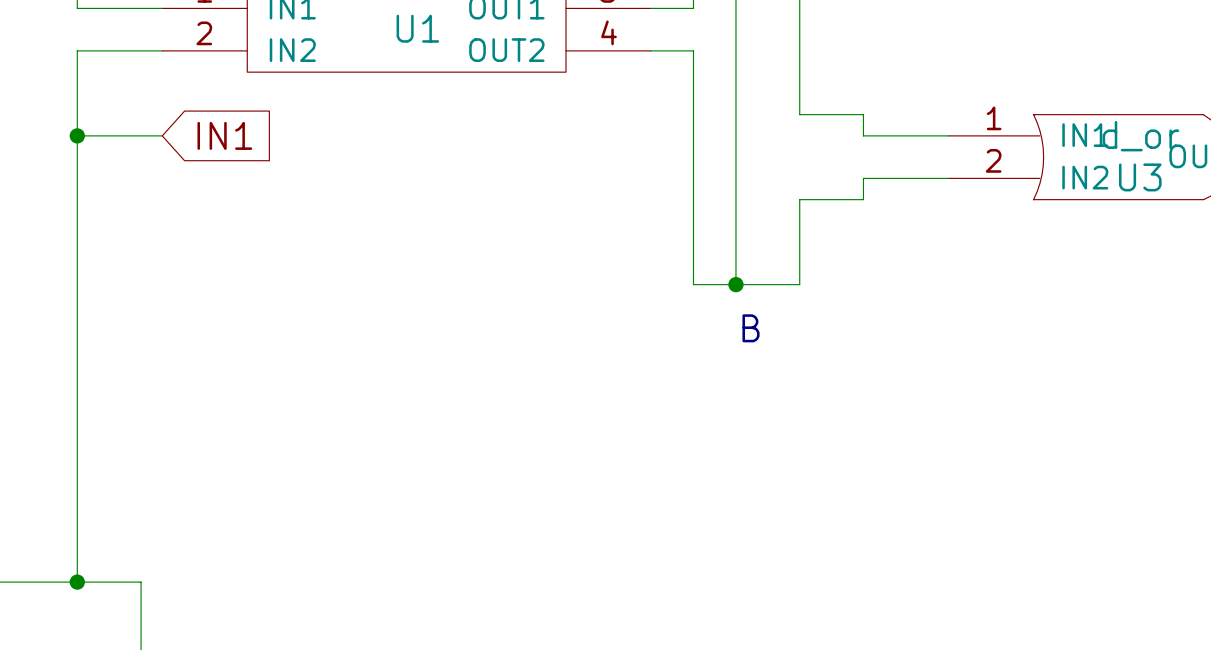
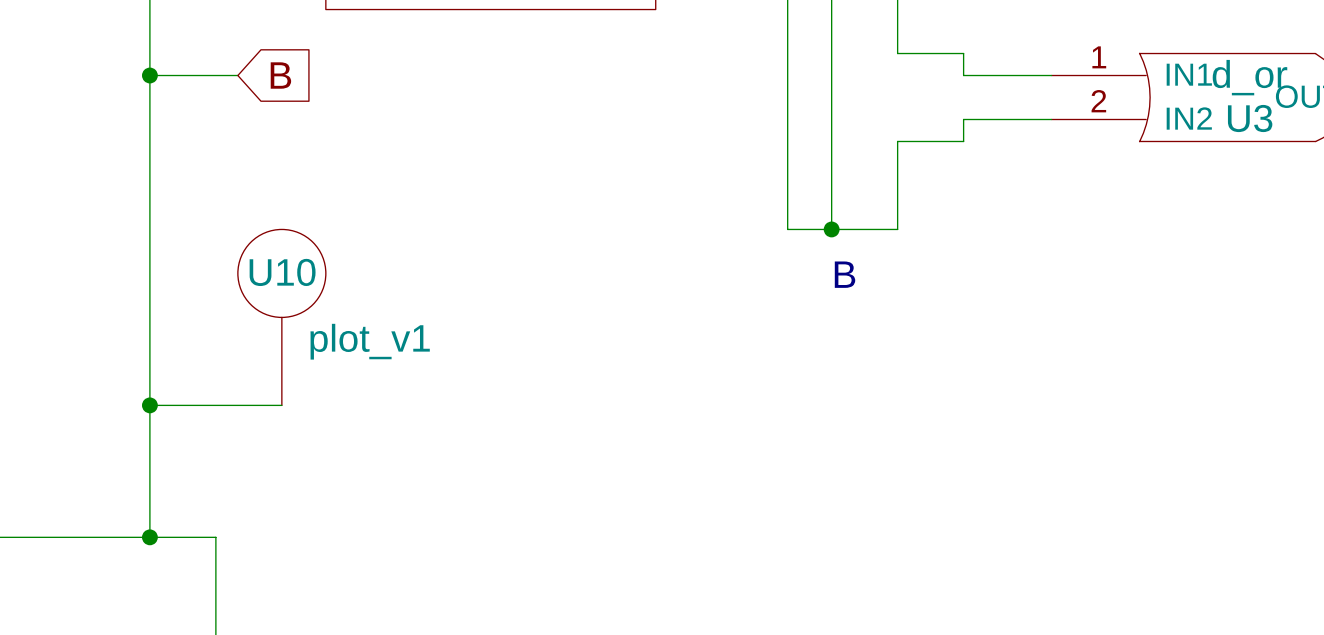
global label: IN1 (224, 135) -> B (280, 75)
U10: none -> plot_v1 (281, 317)
wire: none -> (149, 405) (281, 405)
junction: none -> (149, 405)

